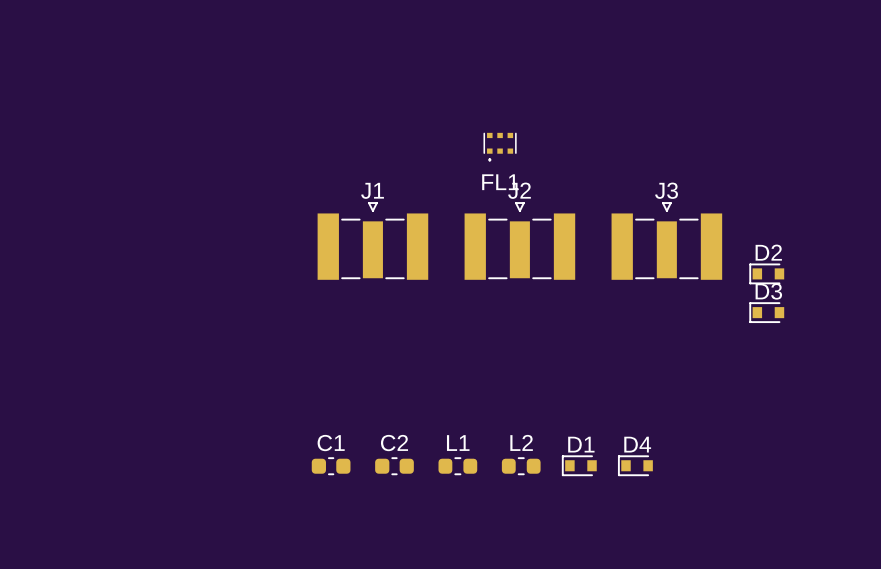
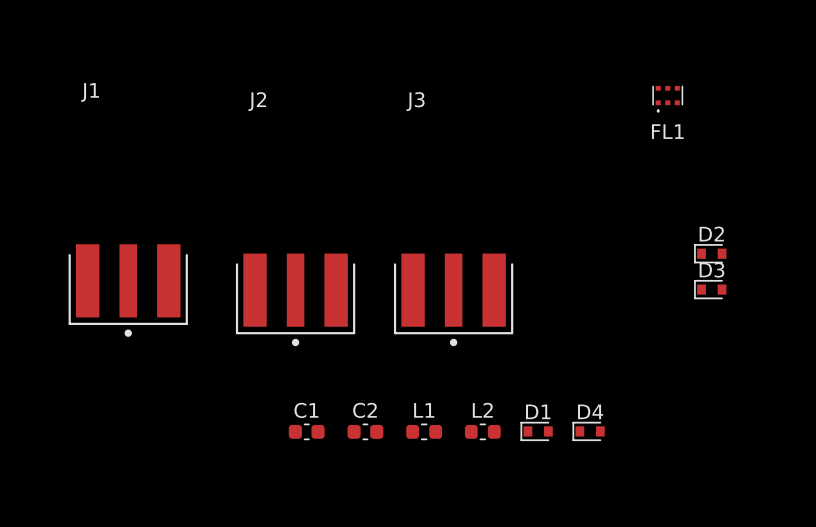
FL1 position: (500, 147) -> (667, 99)
J1 name position: J1 (372, 190) -> J1 (90, 92)
J2 name position: J2 (519, 190) -> J2 (257, 101)
J3 name position: J3 (666, 190) -> J3 (415, 101)
J1 footprint: [317, 202, 429, 280] -> [68, 244, 188, 337]
J2 footprint: [464, 202, 576, 280] -> [235, 253, 356, 347]
J3 footprint: [611, 202, 723, 280] -> [393, 253, 514, 347]

